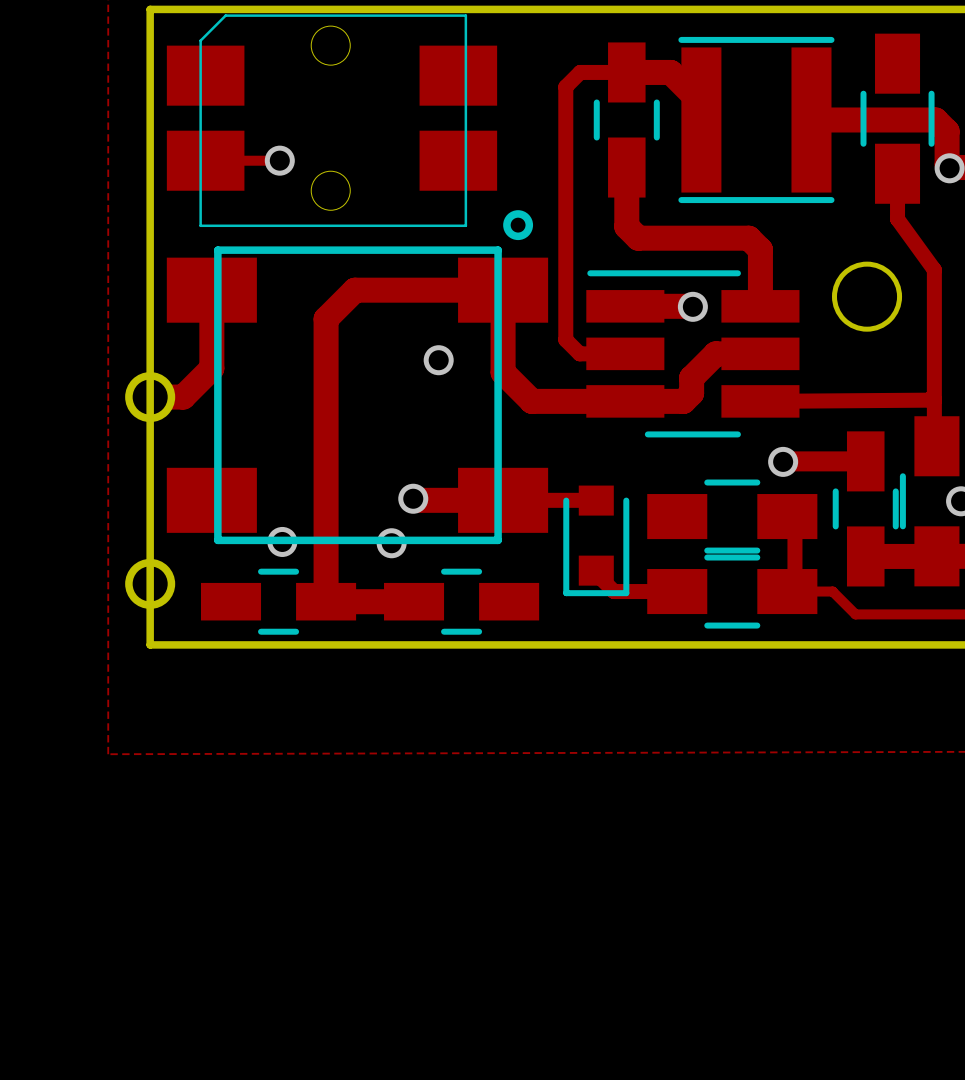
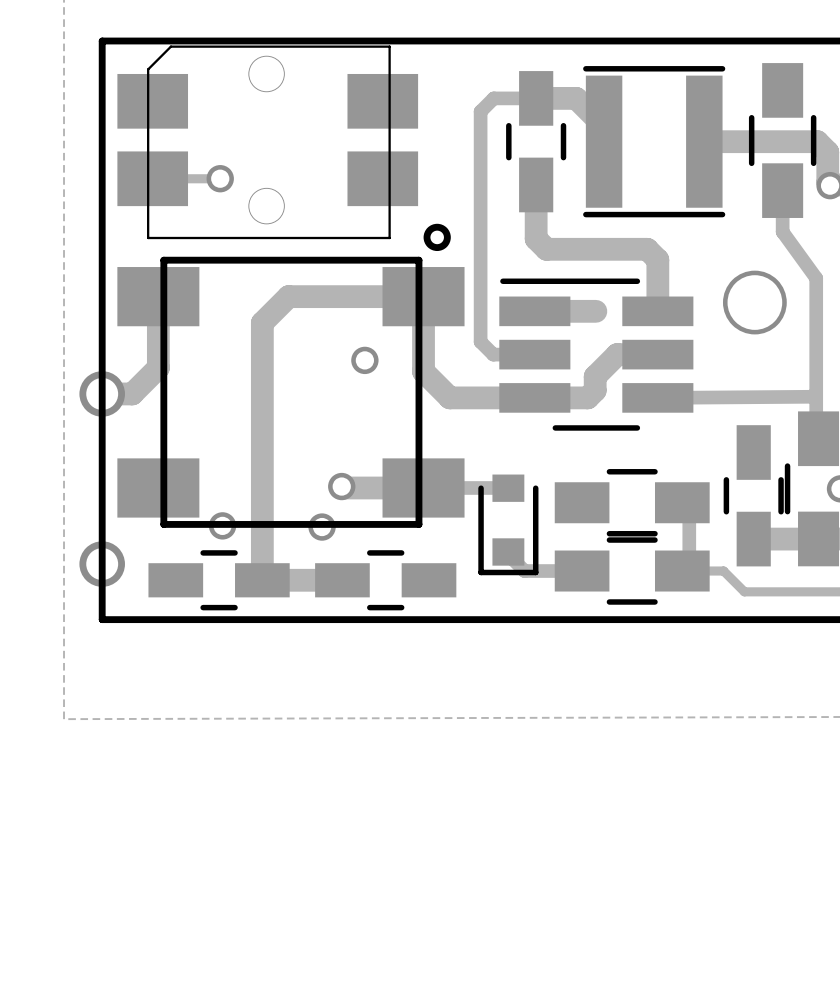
via: (692, 306) -> none
track: (783, 461) (865, 461) -> none
via: (783, 461) -> none

